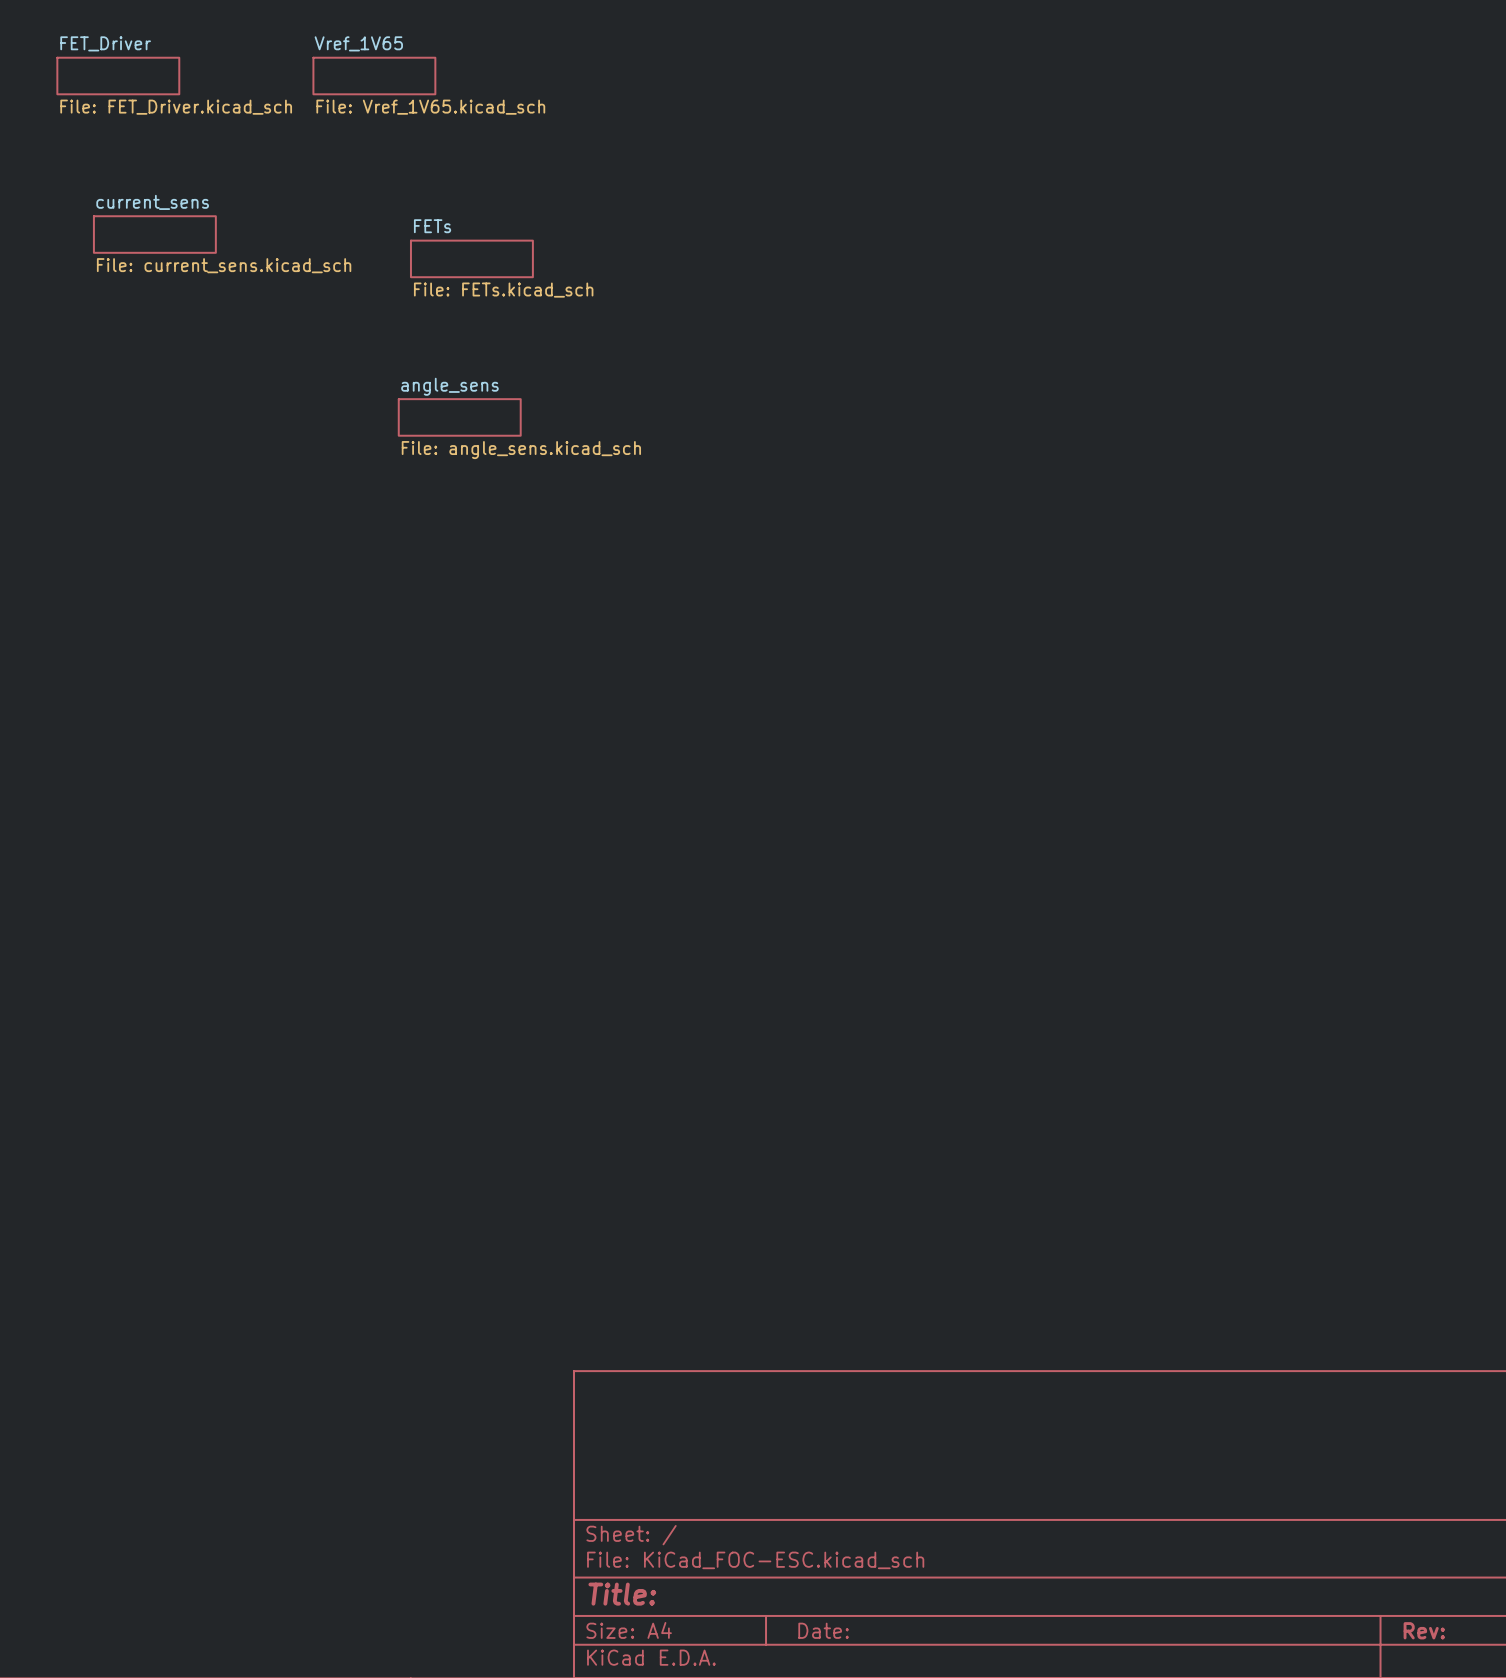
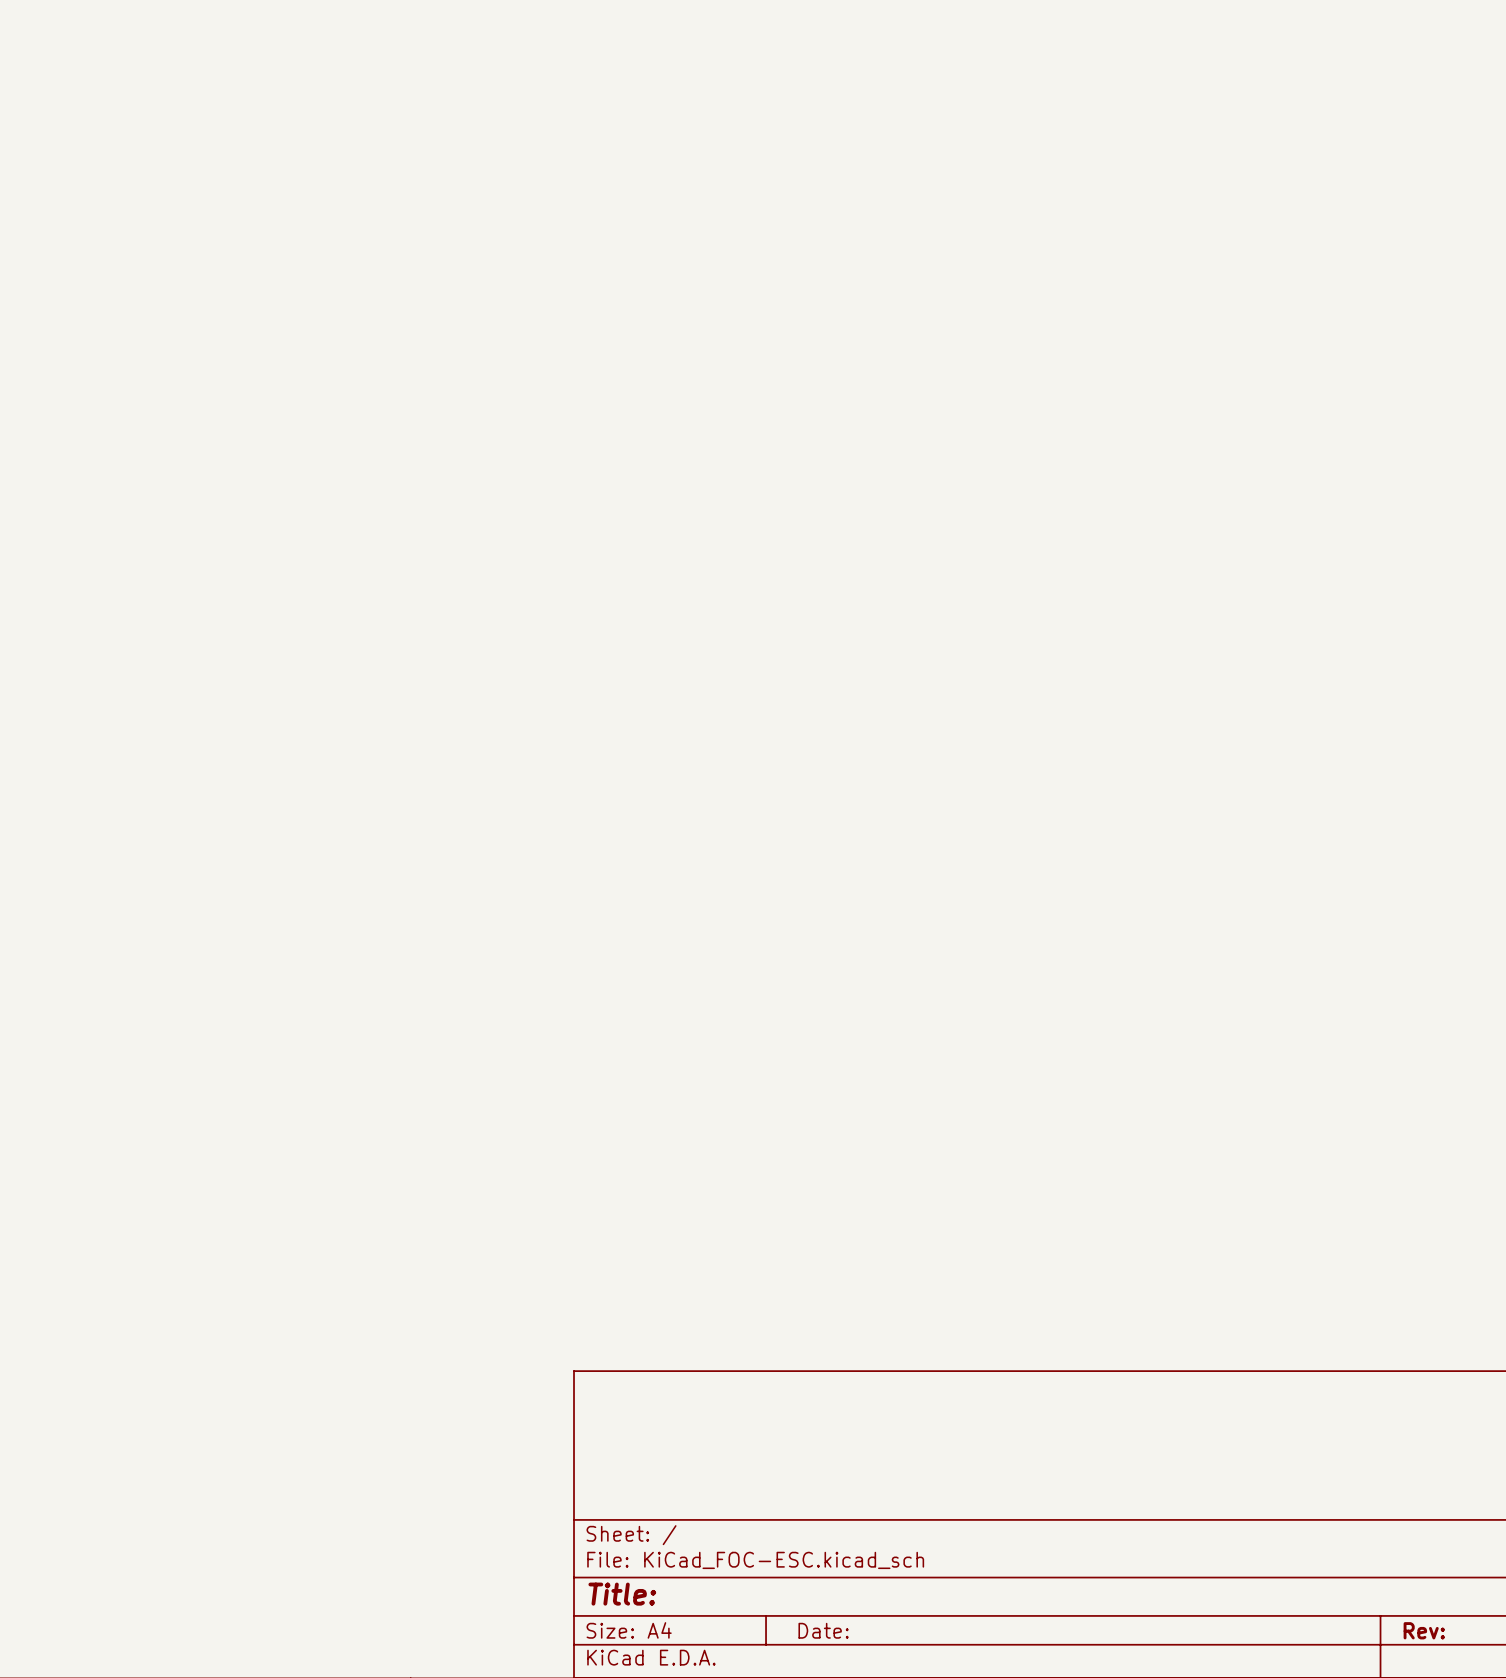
sheet FET_Driver: File: FET_Driver.kicad_sch (118, 76) -> none
sheet Vref_1V65: File: Vref_1V65.kicad_sch (374, 76) -> none
sheet current_sens: File: current_sens.kicad_sch (154, 234) -> none
sheet FETs: File: FETs.kicad_sch (471, 258) -> none
sheet angle_sens: File: angle_sens.kicad_sch (459, 417) -> none

